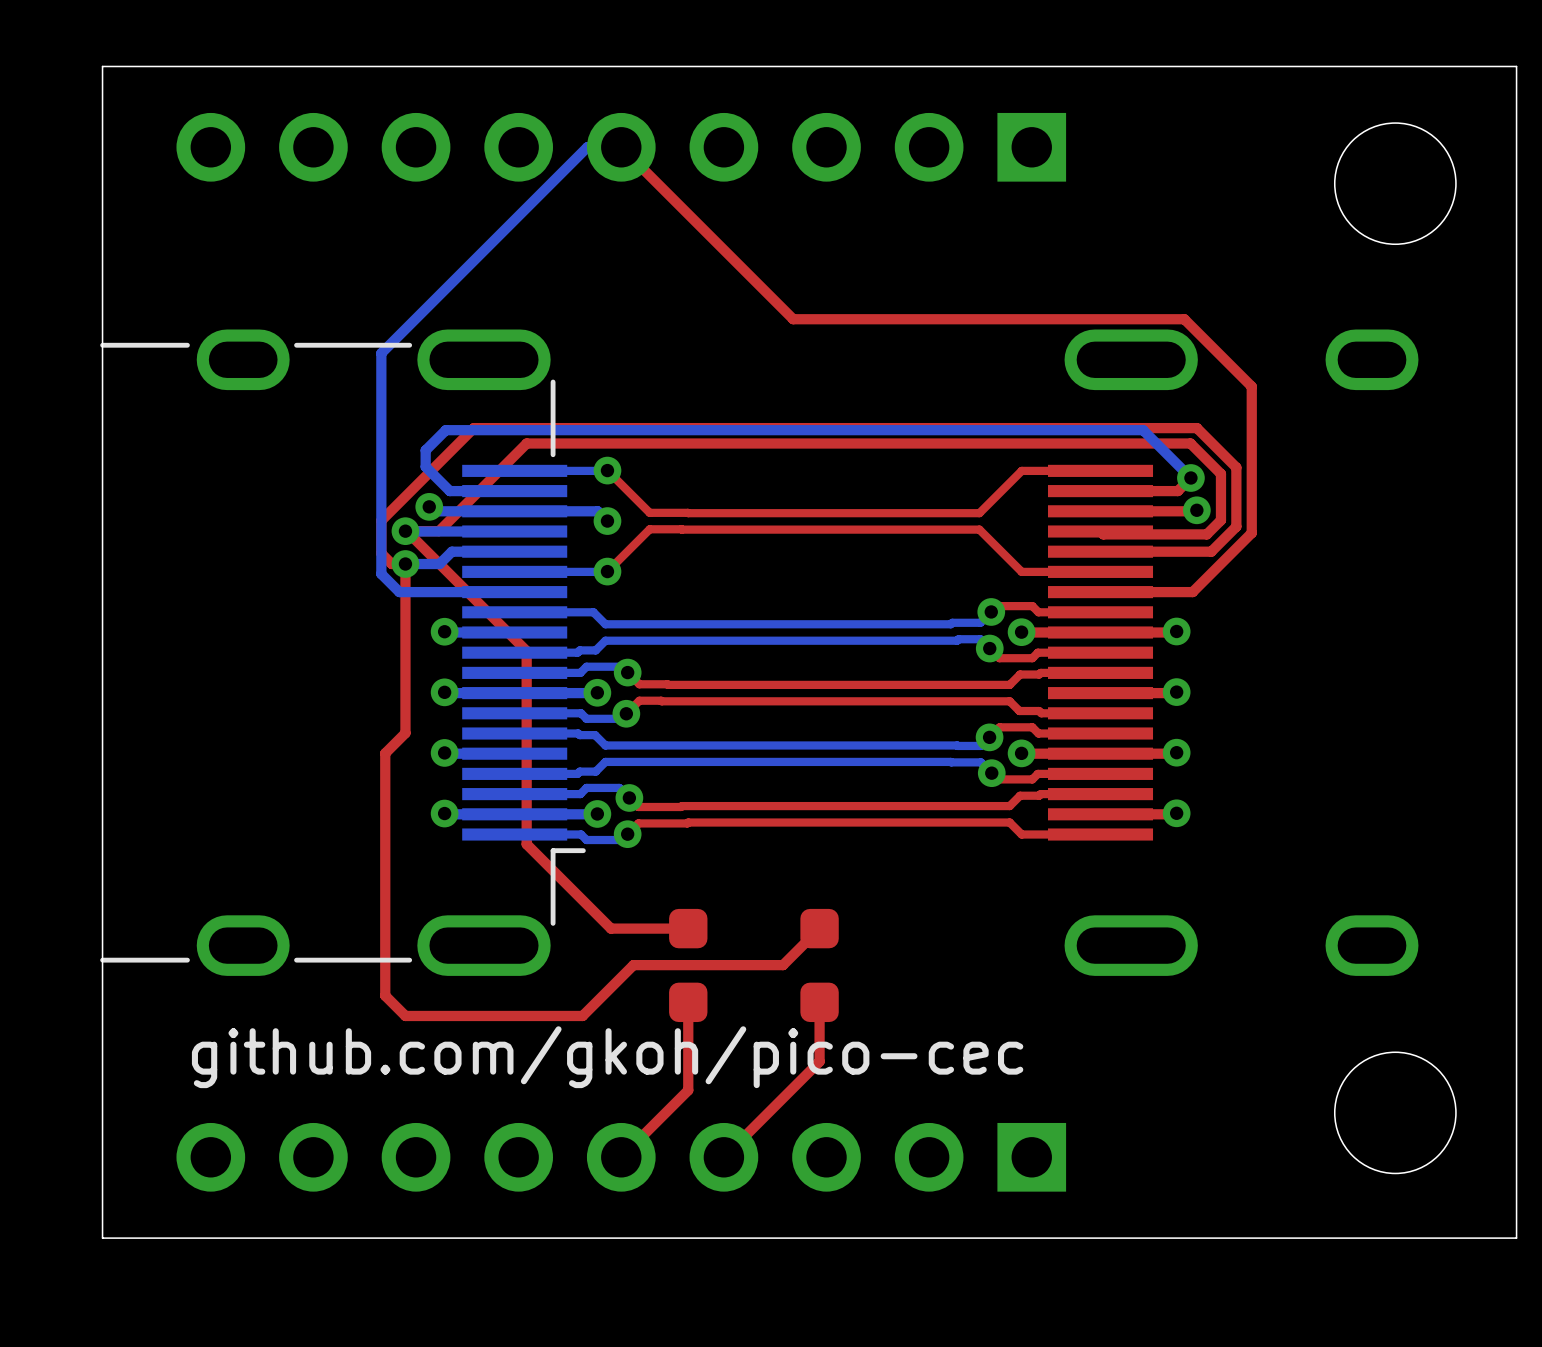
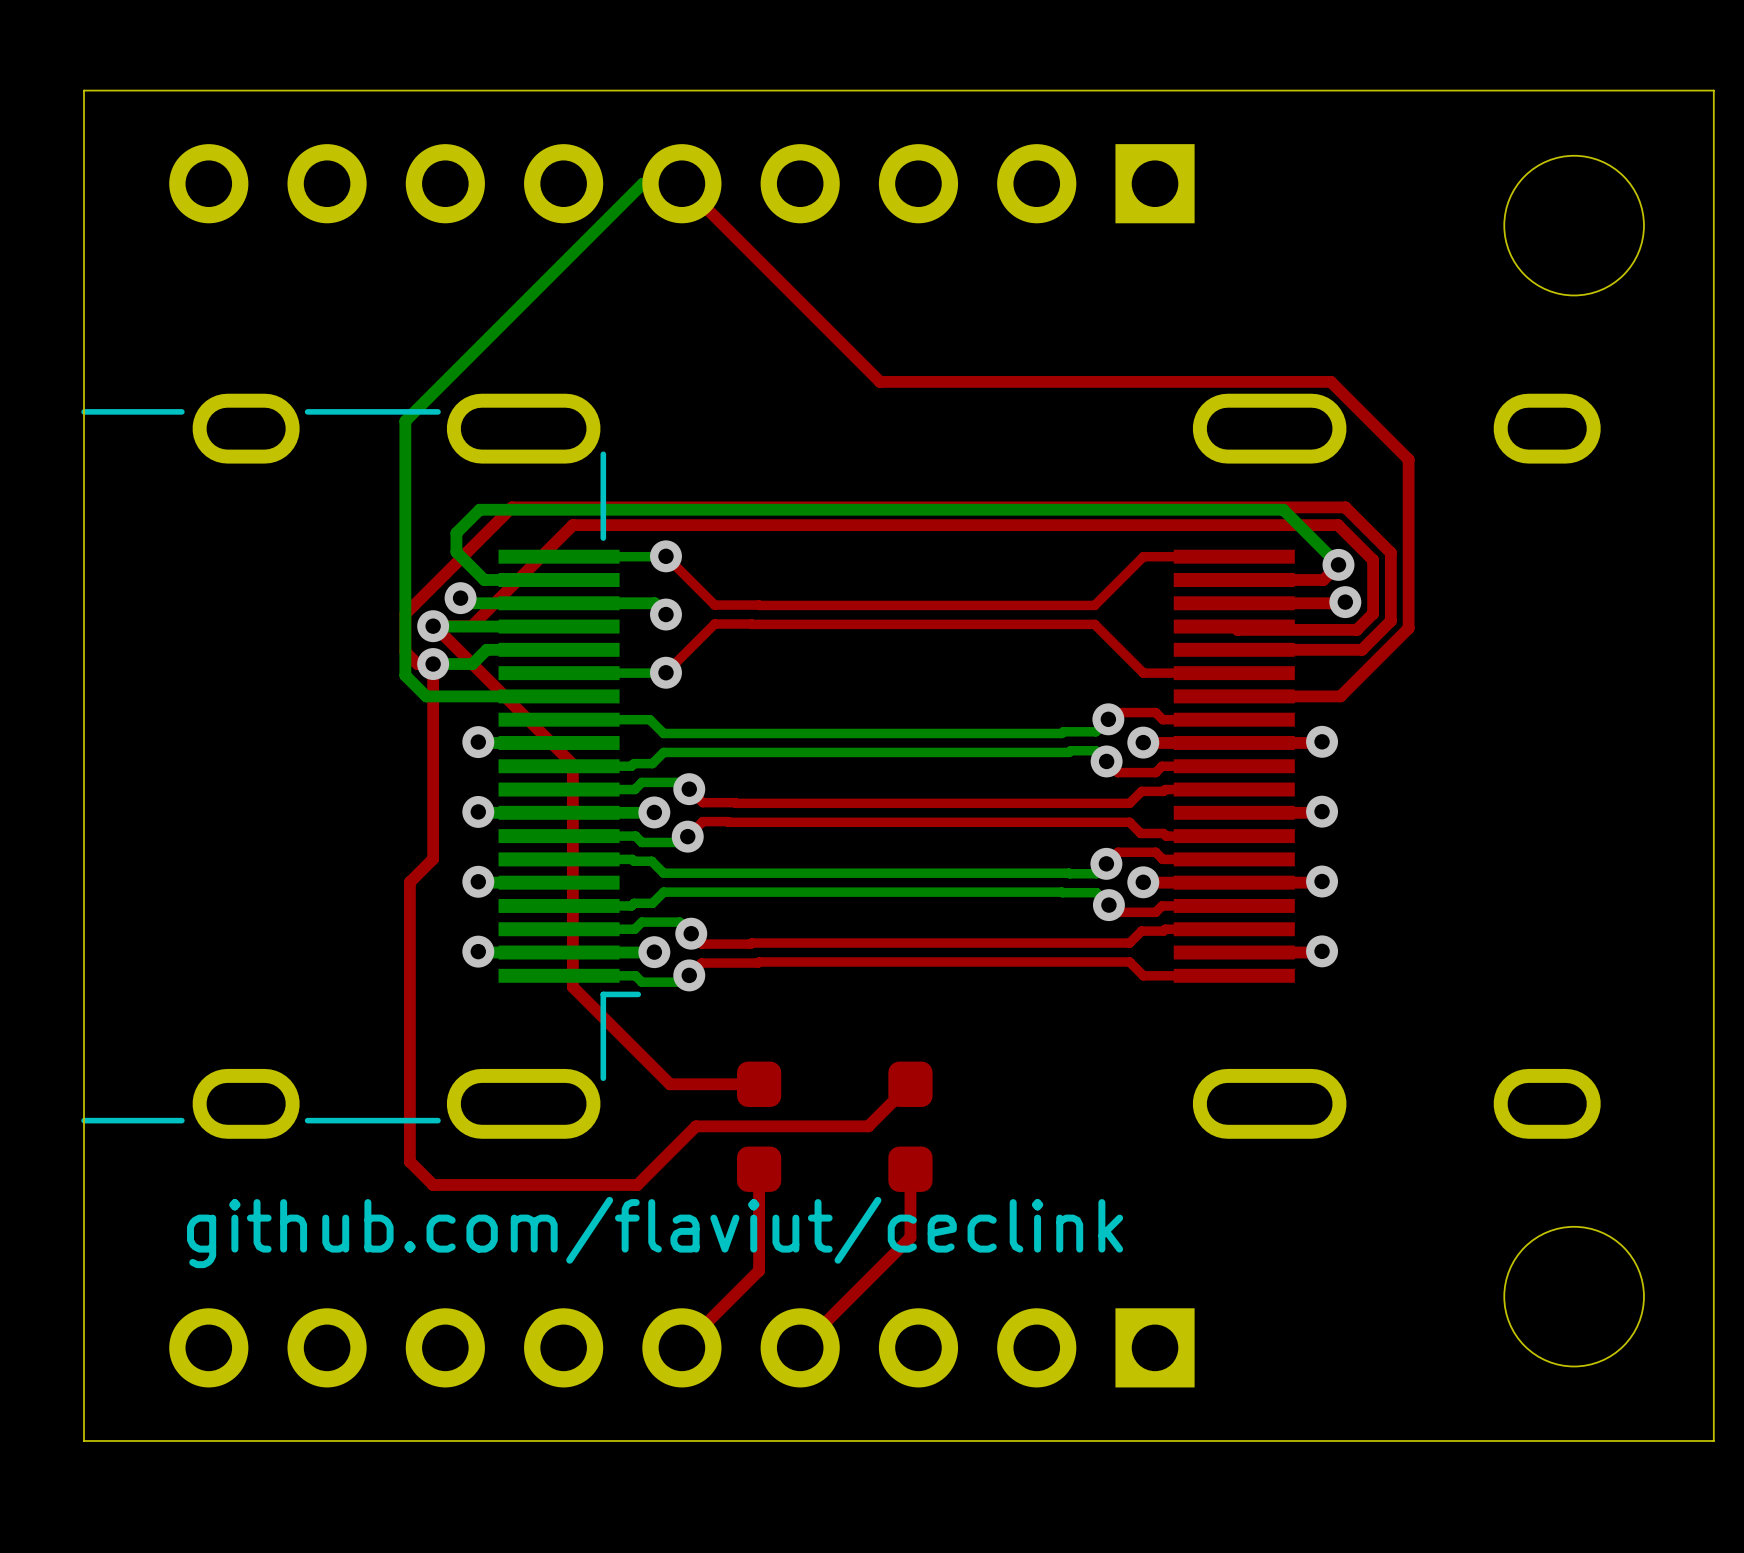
text: github.com/gkoh/pico-cec (607, 1057) -> github.com/flaviut/ceclink (655, 1232)

